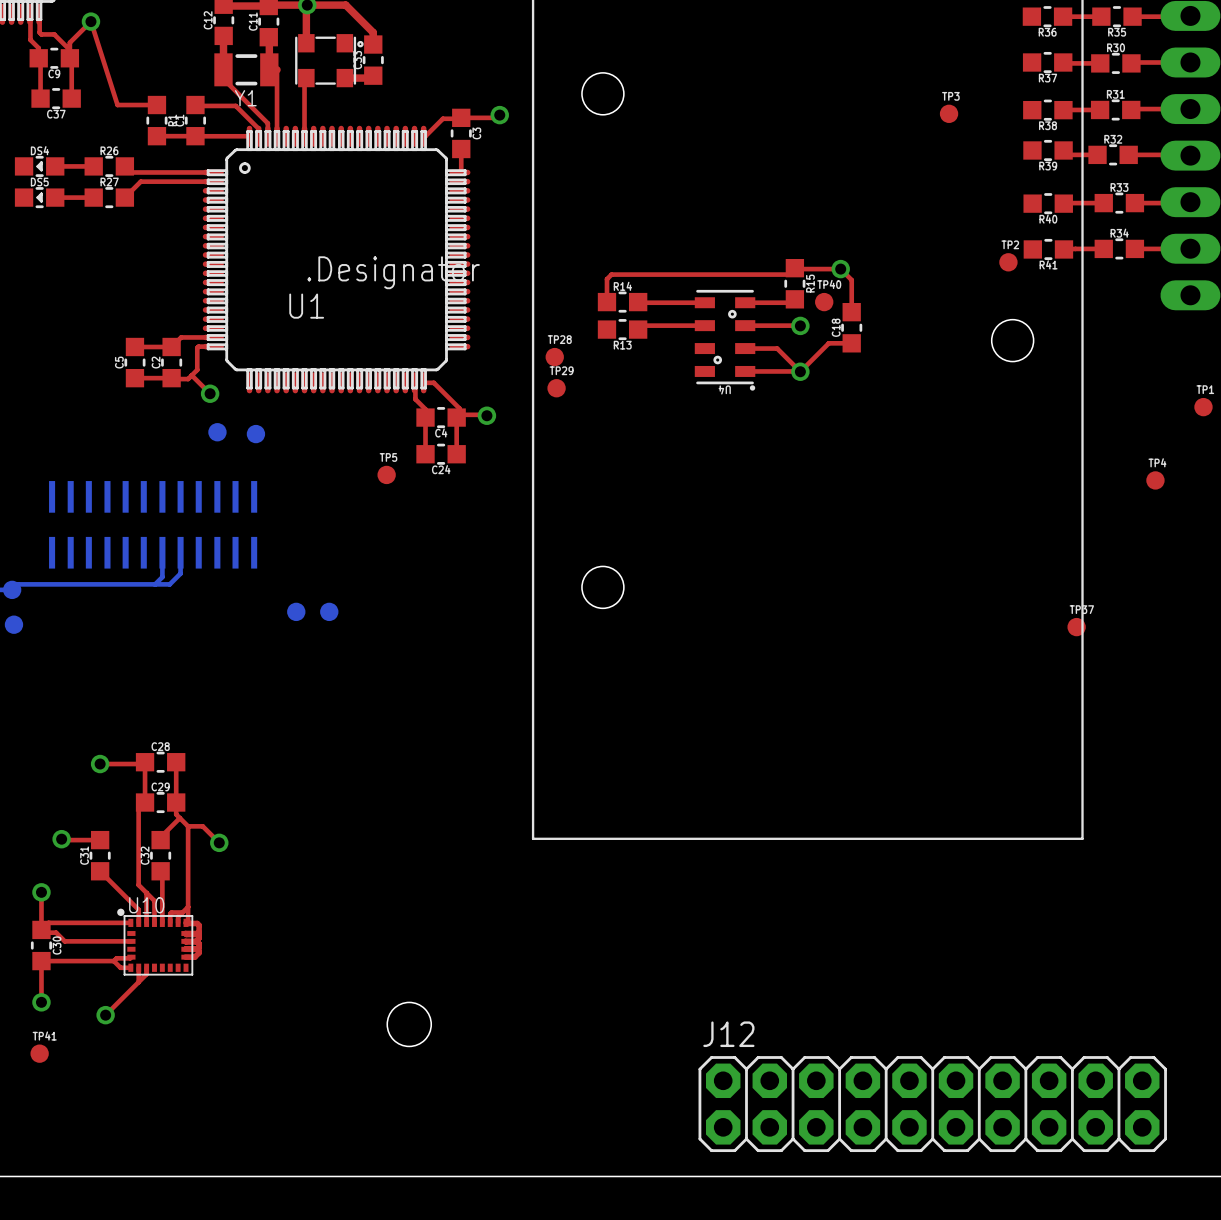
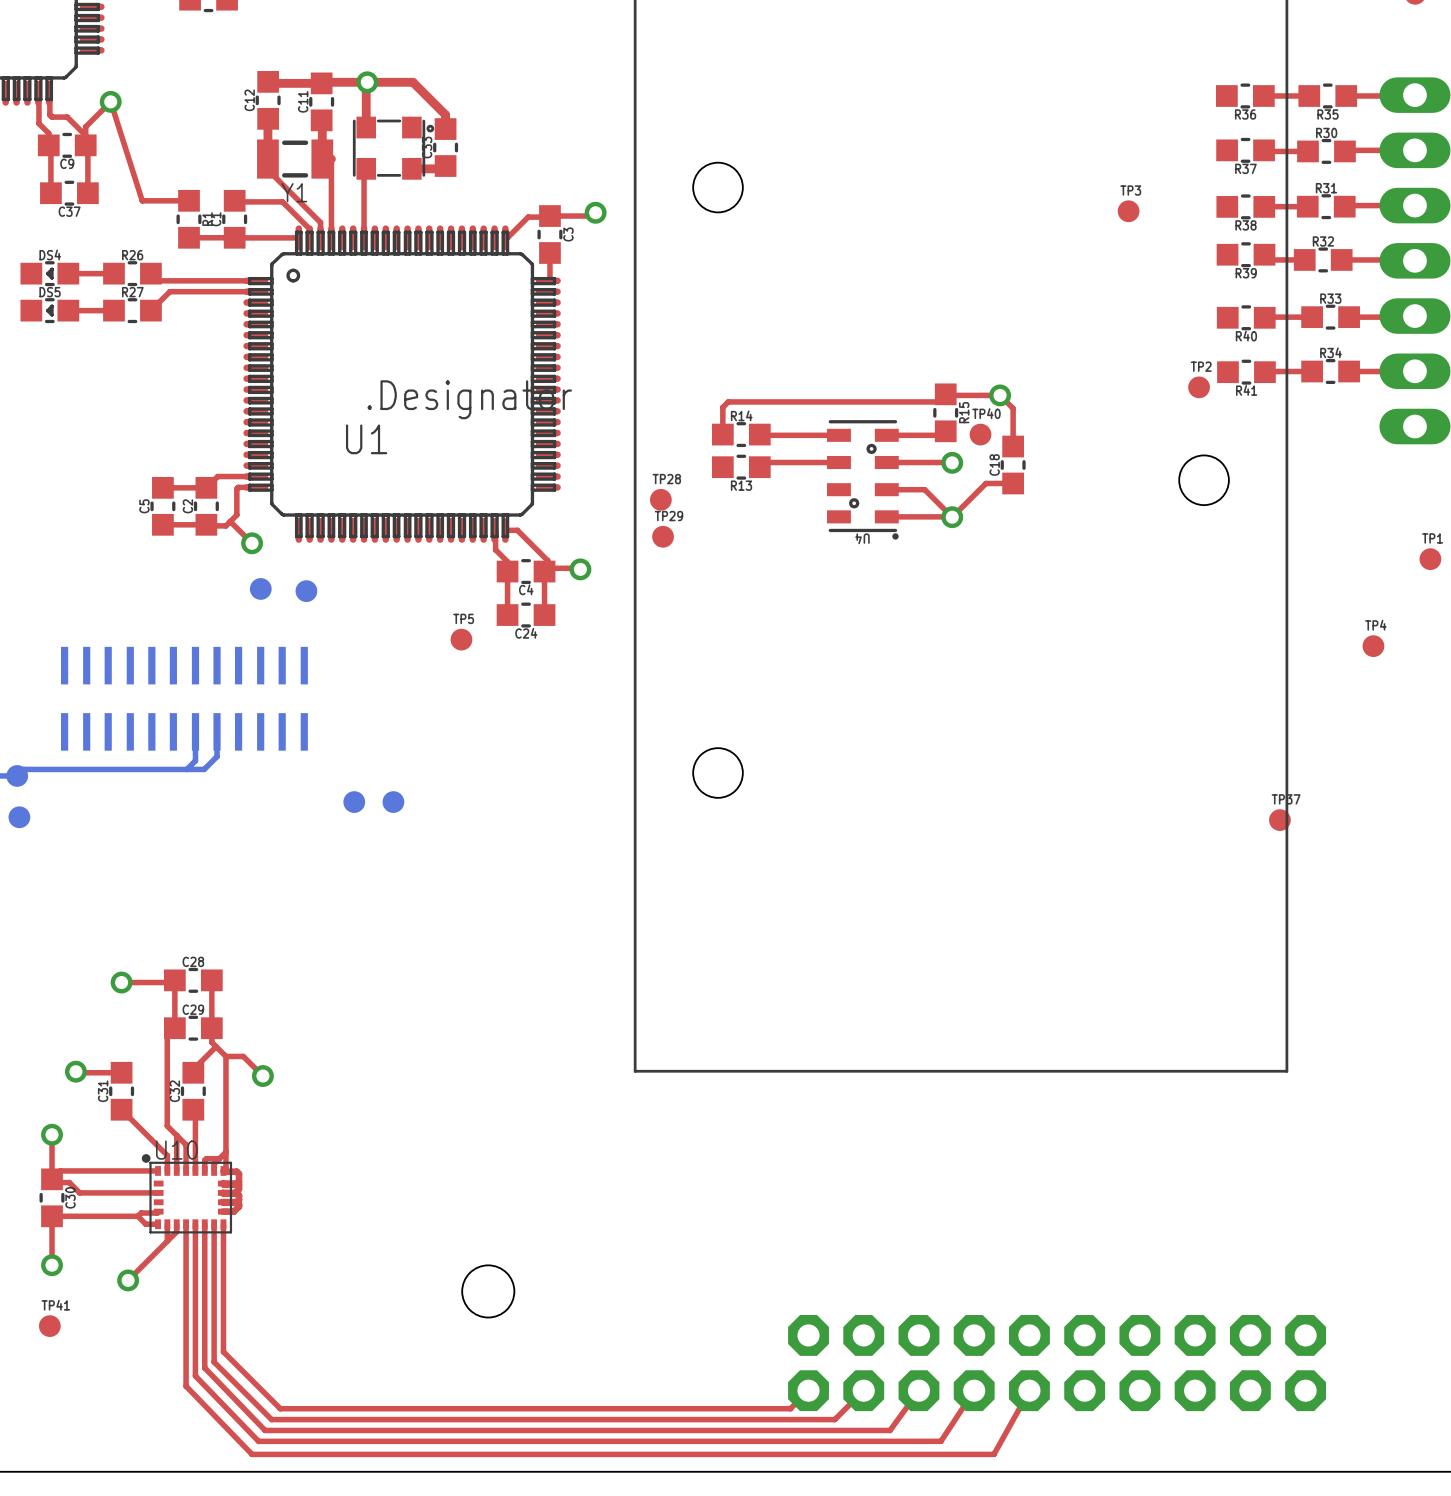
top track: none -> (186, 1224) (186, 1386) (252, 1454) (993, 1454) (1029, 1390)
top track: none -> (195, 1224) (195, 1376) (258, 1441) (940, 1441) (974, 1390)
top track: none -> (204, 1224) (204, 1367) (265, 1430) (890, 1430) (918, 1390)
top track: none -> (214, 1224) (214, 1362) (271, 1419) (834, 1419) (863, 1390)
top track: none -> (223, 1224) (223, 1351) (280, 1408) (790, 1408) (808, 1390)
J12 side: top (932, 1104) -> bottom (1057, 1363)

